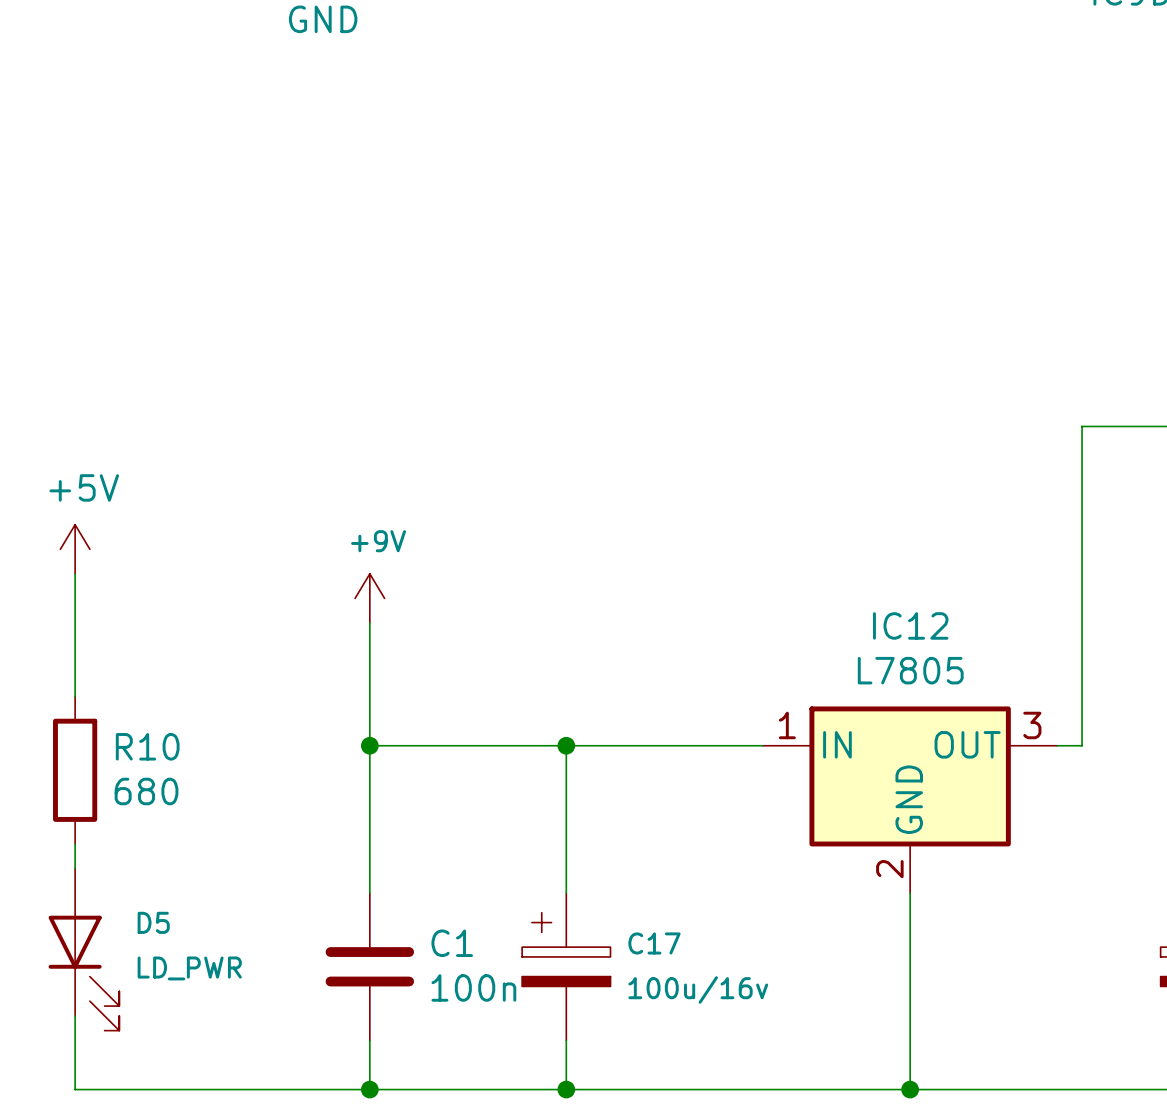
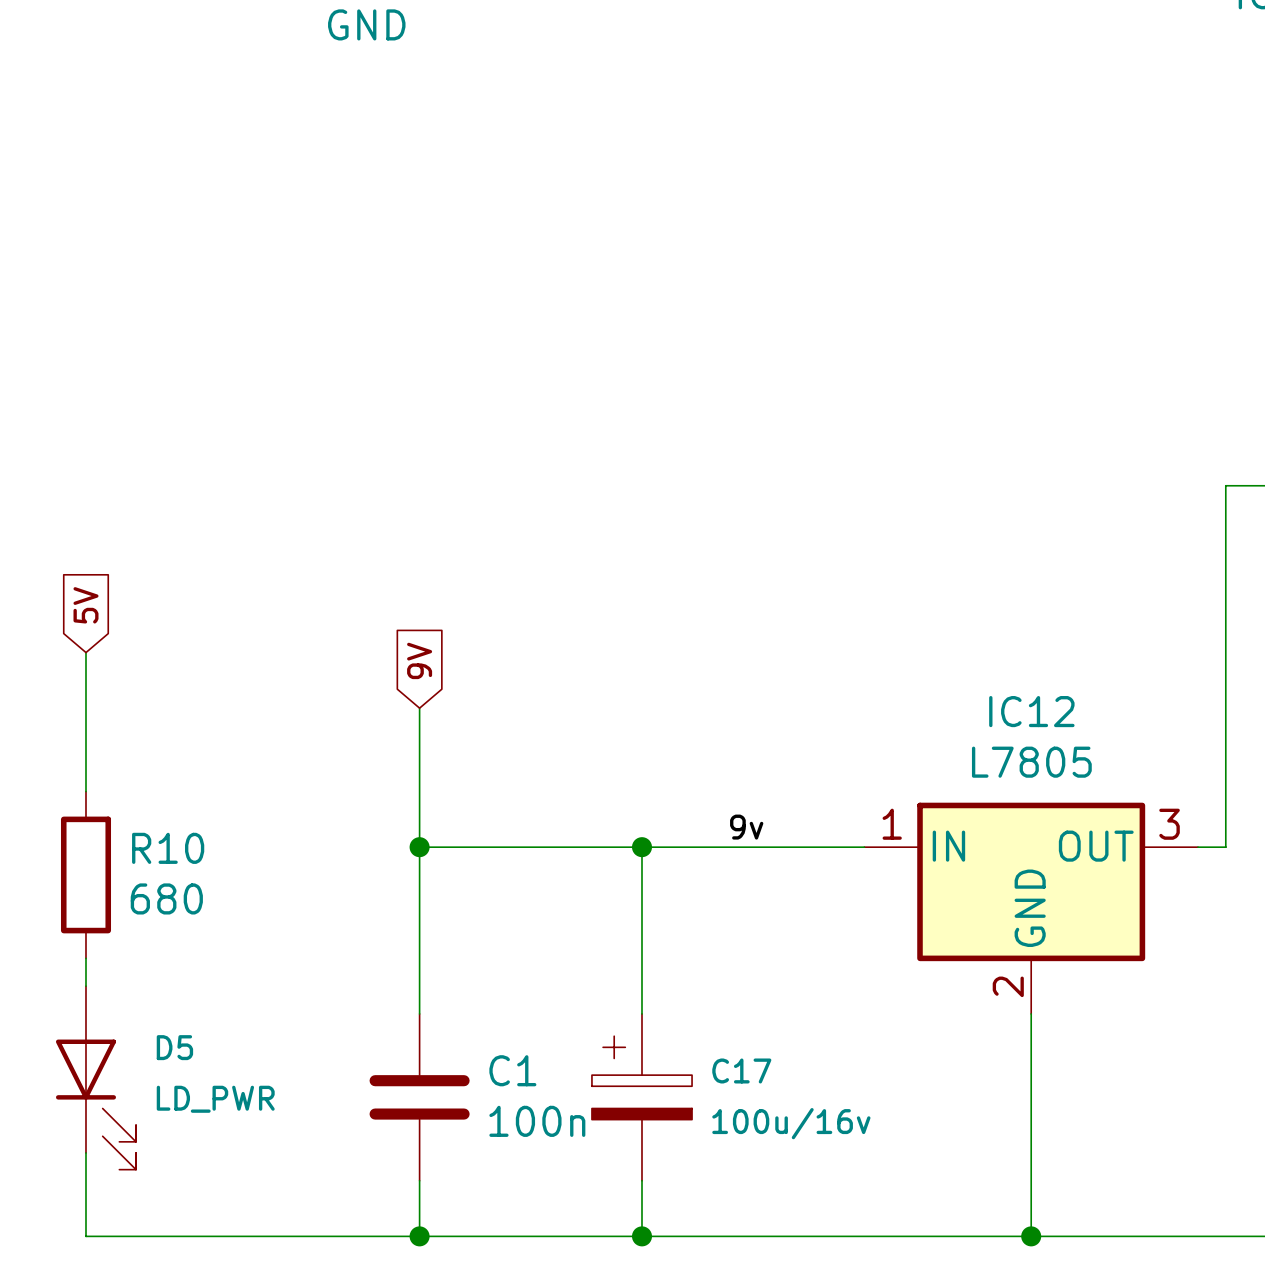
global label: none -> 5V (85, 605)
power symbol: +5V (75, 549) -> none
global label: none -> 9V (419, 660)
power symbol: +9V (369, 598) -> none
label: none -> 9v (746, 827)

